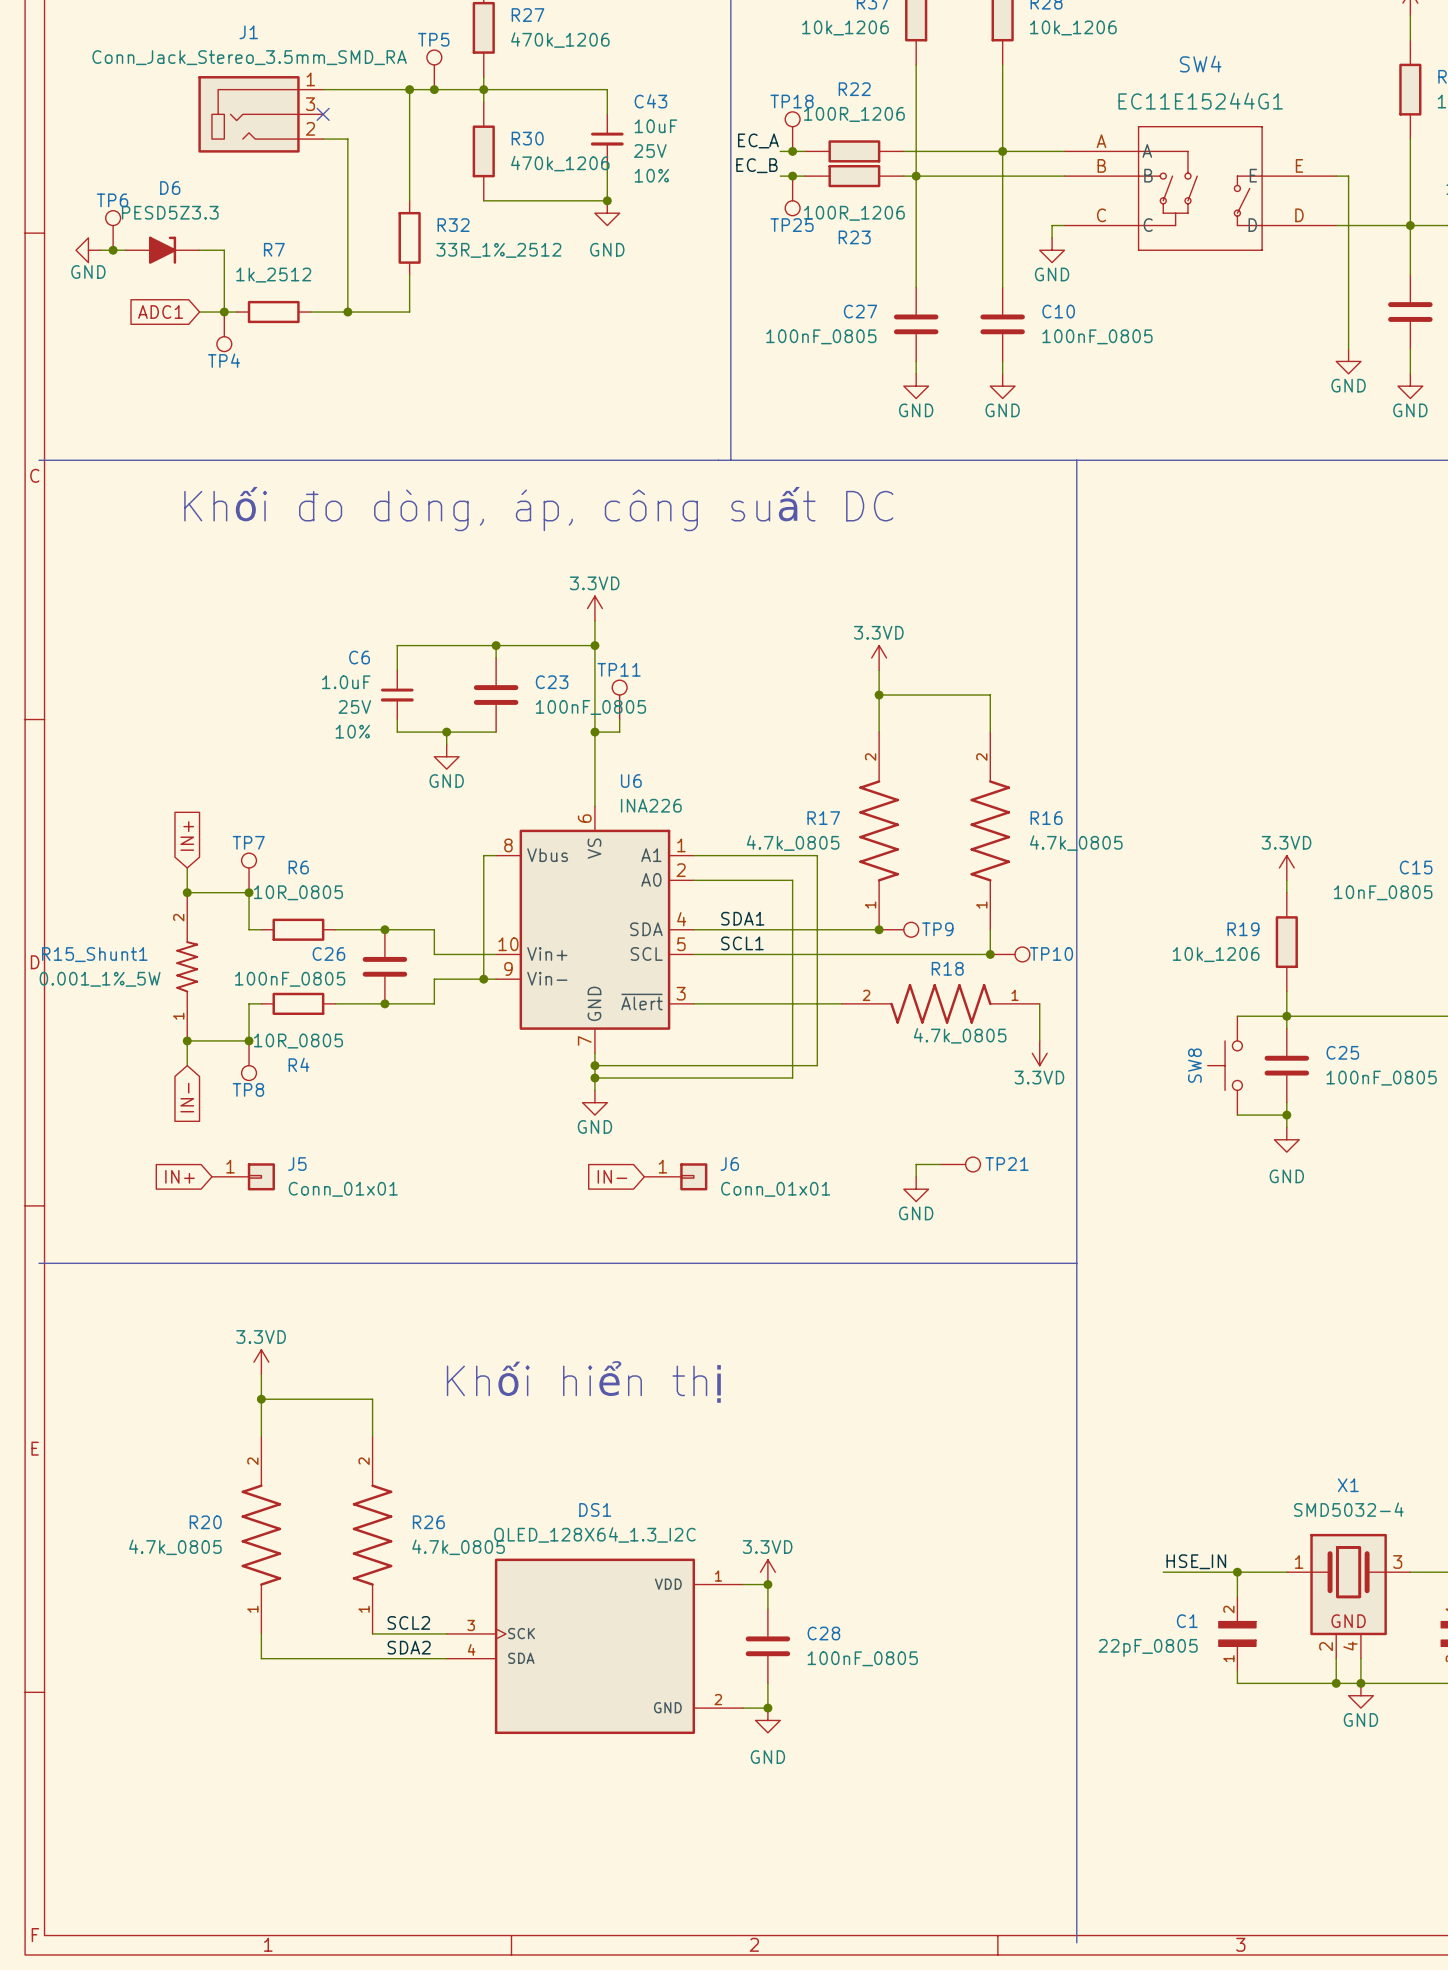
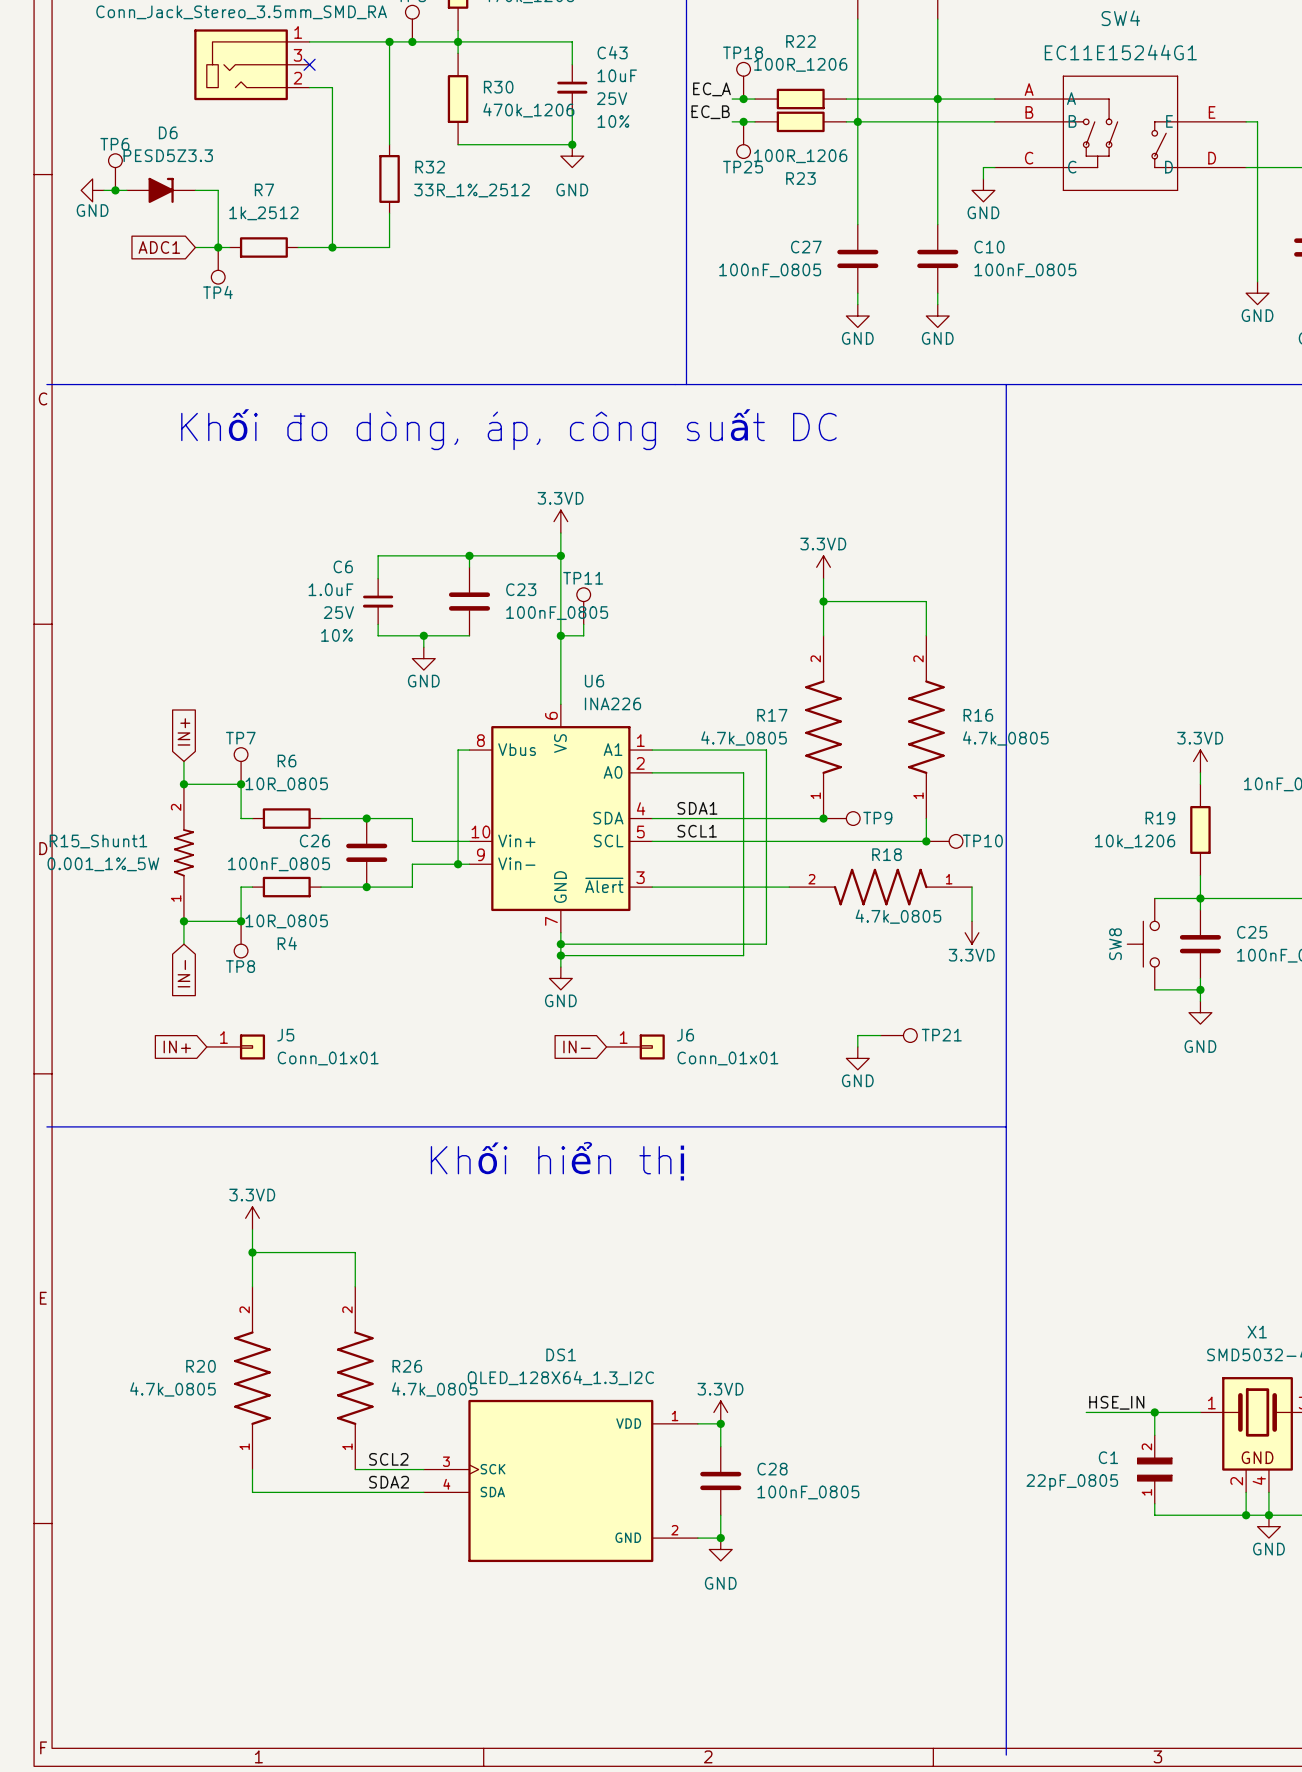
text position: Khối hiển thị (584, 1381) -> Khối hiển thị (557, 1161)

